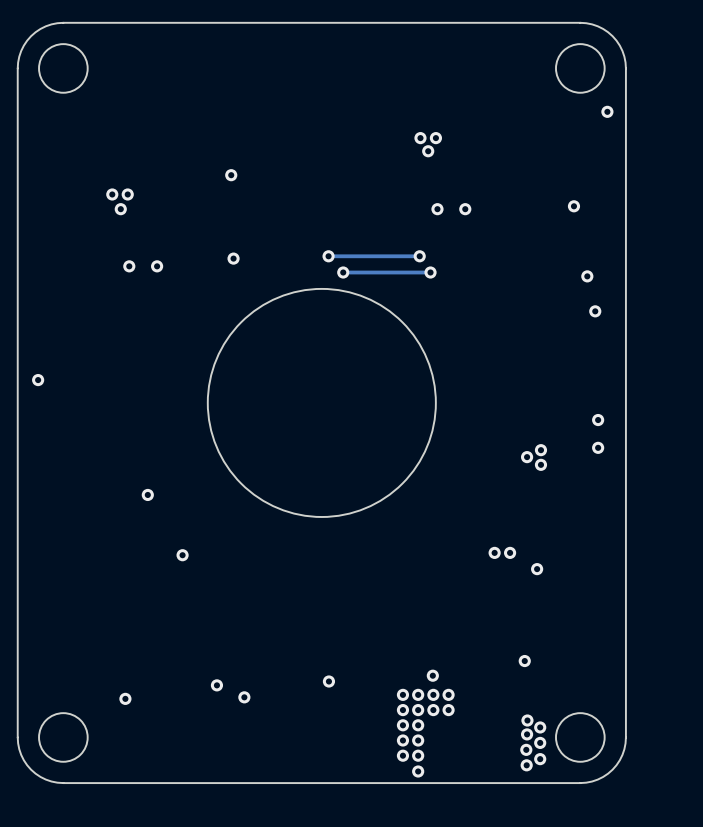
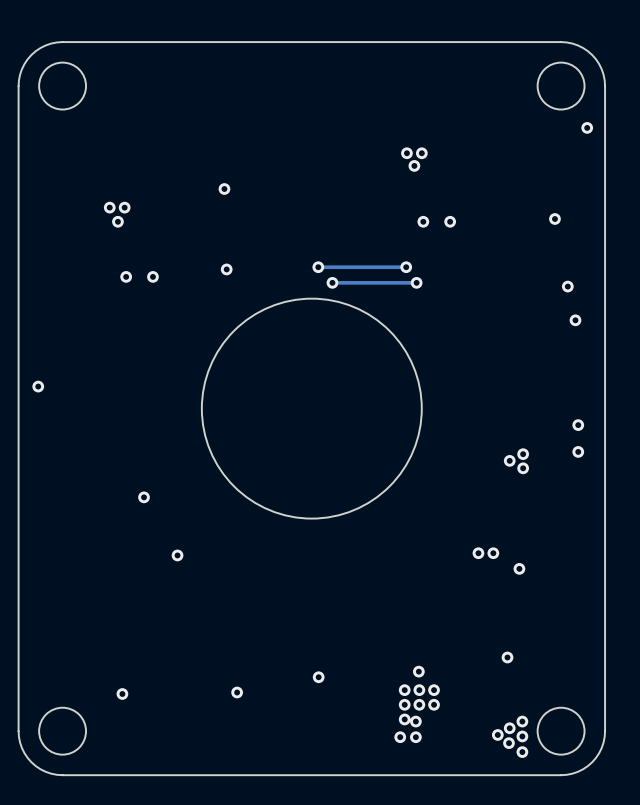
via: (216, 685) -> none
via: (402, 694) -> none
via: (402, 710) -> none
via: (527, 720) -> none
via: (402, 725) -> none
via: none -> (415, 721)
via: (402, 740) -> none
via: (418, 740) -> none
via: none -> (497, 734)
via: none -> (400, 737)
via: none -> (415, 737)
via: (402, 755) -> none
via: (418, 755) -> none
via: (526, 765) -> none
via: (418, 771) -> none

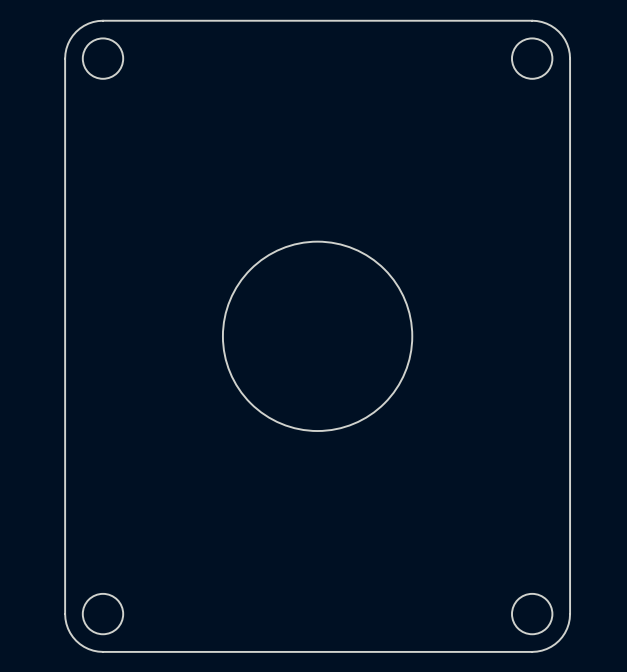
via: (587, 127) -> none
via: (406, 153) -> none
via: (421, 153) -> none
via: (414, 165) -> none
via: (224, 189) -> none
via: (109, 207) -> none
via: (124, 207) -> none
via: (554, 219) -> none
via: (117, 221) -> none
via: (423, 221) -> none
via: (450, 221) -> none
via: (318, 267) -> none
track: (406, 267) (318, 267) -> none
via: (406, 267) -> none
via: (226, 269) -> none
via: (126, 276) -> none
via: (152, 276) -> none
via: (332, 282) -> none
track: (416, 282) (332, 282) -> none
via: (416, 282) -> none
via: (567, 286) -> none
via: (575, 320) -> none
via: (38, 386) -> none
via: (578, 425) -> none
via: (578, 451) -> none
via: (523, 454) -> none
via: (509, 460) -> none
via: (523, 468) -> none
via: (144, 497) -> none
via: (478, 553) -> none
via: (493, 553) -> none
via: (177, 555) -> none
via: (519, 568) -> none
via: (507, 657) -> none
via: (418, 671) -> none
via: (318, 677) -> none
via: (404, 690) -> none
via: (419, 690) -> none
via: (434, 690) -> none
via: (237, 692) -> none
via: (122, 693) -> none
via: (404, 704) -> none
via: (419, 704) -> none
via: (434, 704) -> none
via: (404, 719) -> none
via: (415, 721) -> none
via: (522, 721) -> none
via: (509, 728) -> none
via: (497, 734) -> none
via: (522, 736) -> none
via: (400, 737) -> none
via: (415, 737) -> none
via: (508, 743) -> none
via: (522, 752) -> none

